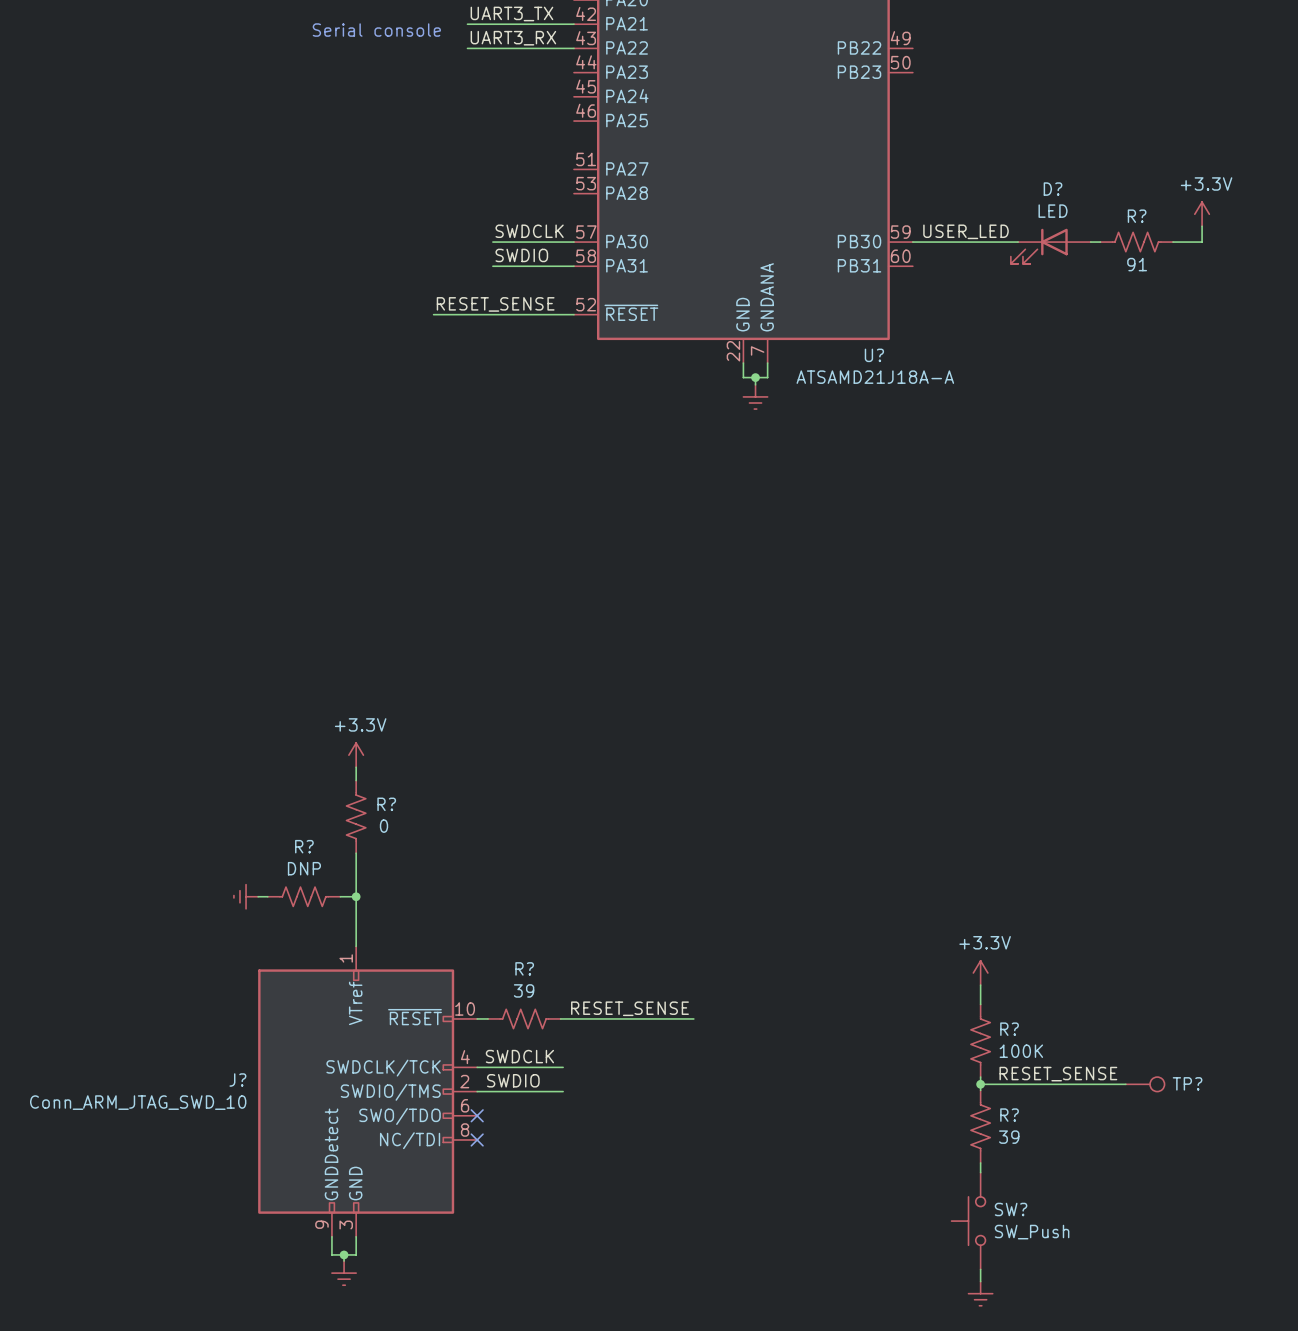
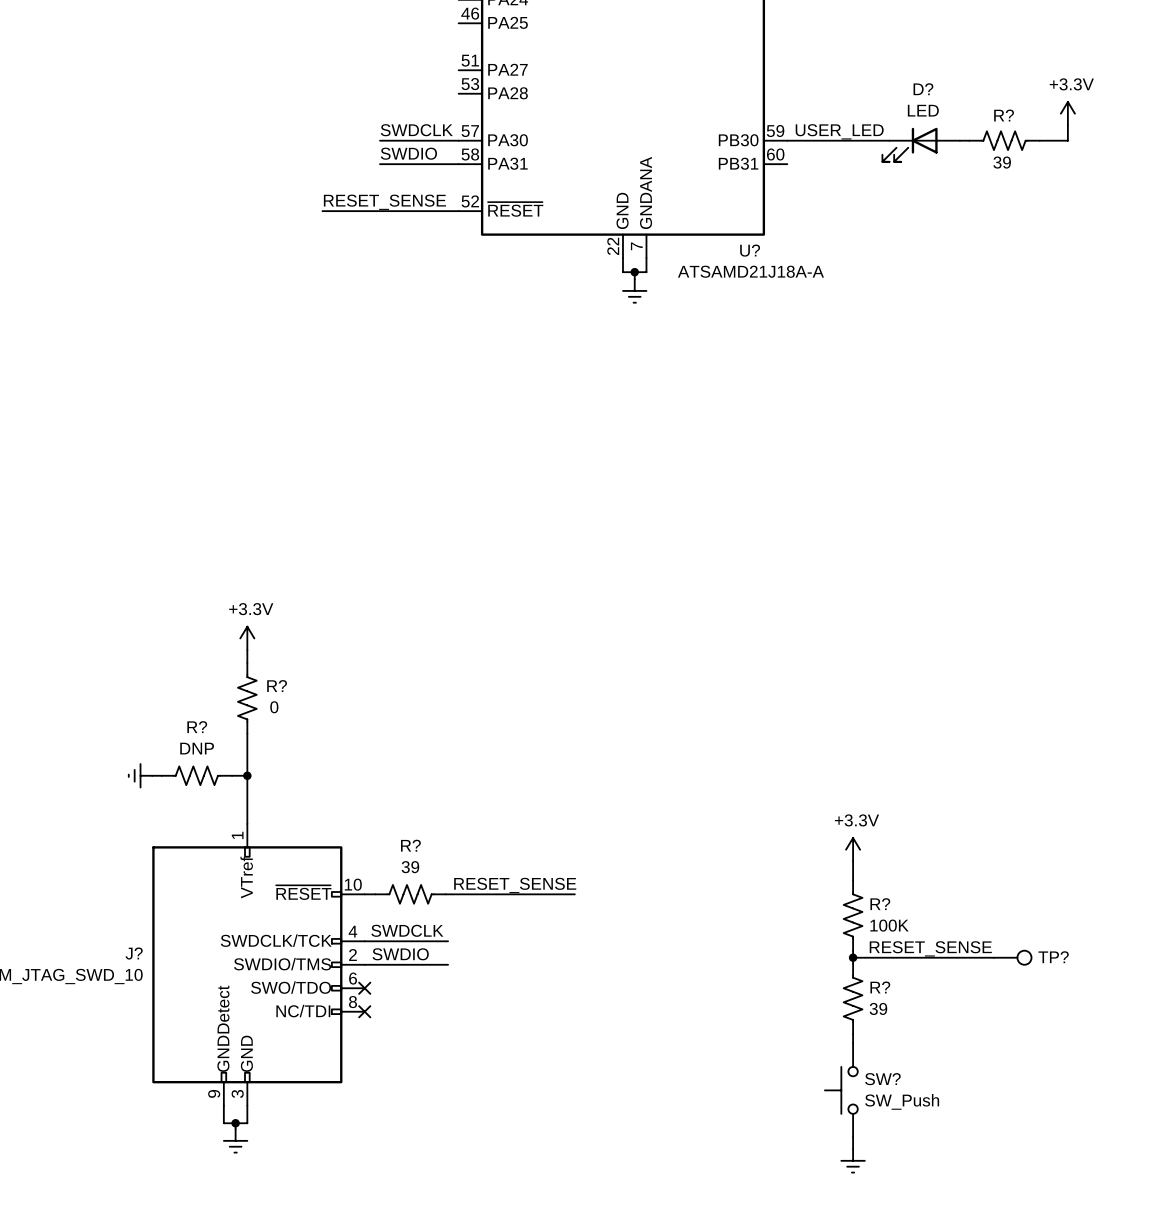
R? value: 91 (1137, 264) -> 39 (1002, 162)

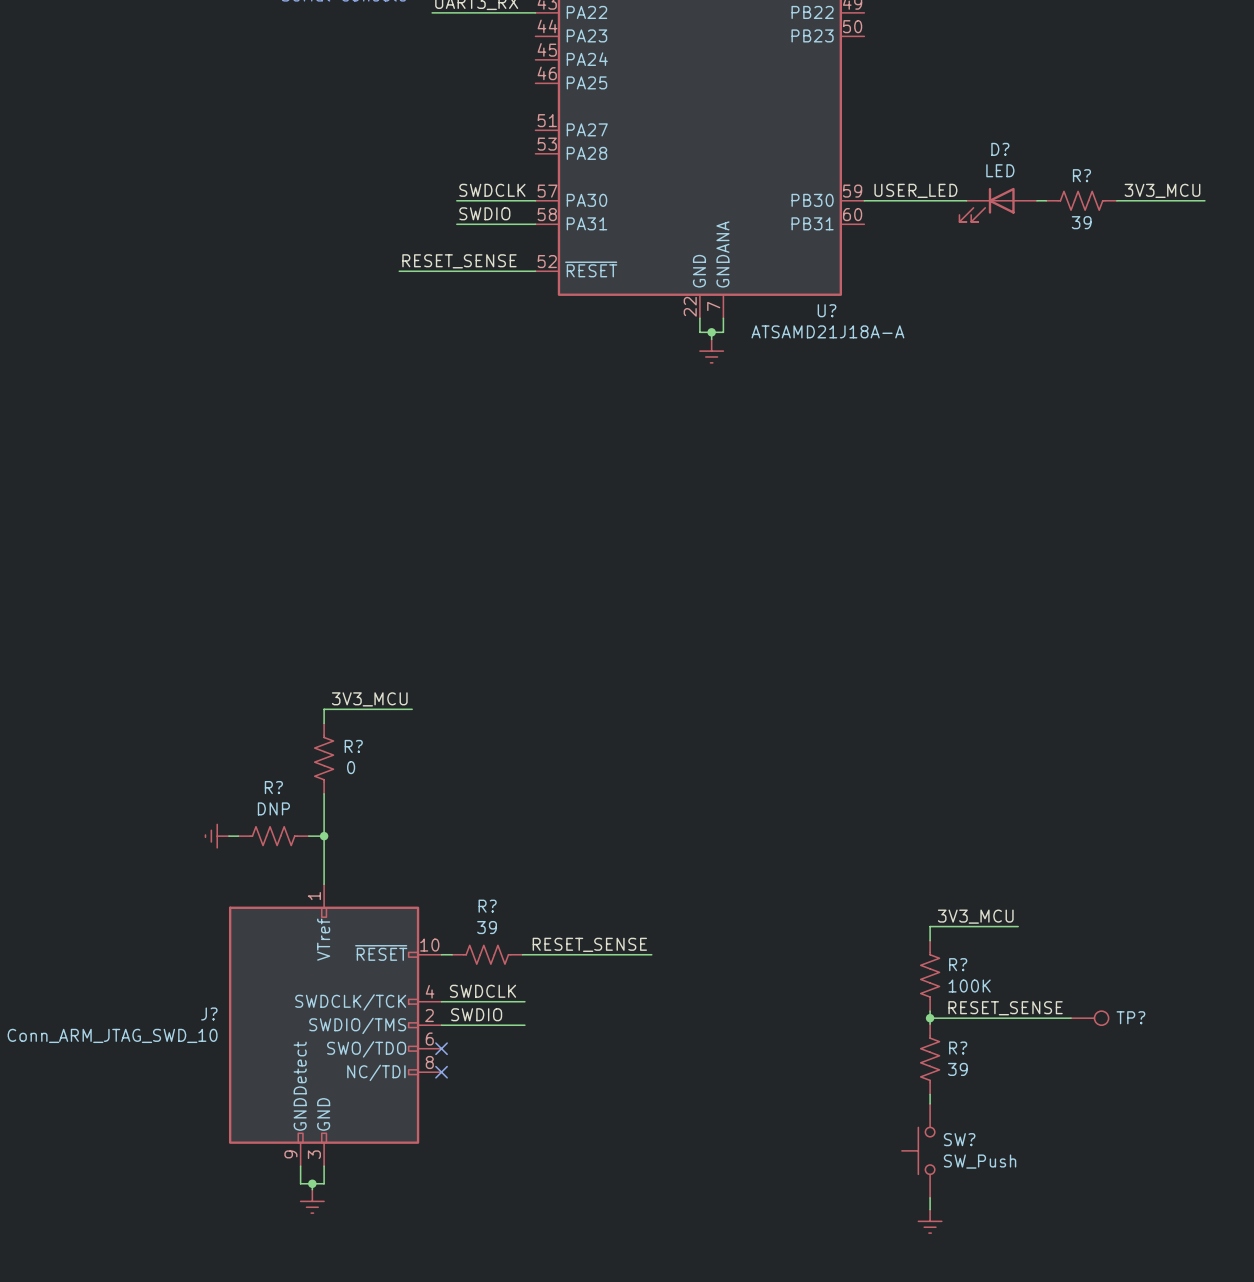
power symbol: +3.3V (1067, 113) -> none
wire: (1067, 125) (1067, 140) -> (1204, 200) (1145, 200)
label: none -> 3V3_MCU (1162, 190)
power symbol: +3.3V (247, 638) -> none
label: none -> 3V3_MCU (369, 699)
wire: none -> (412, 709) (324, 710)
power symbol: +3.3V (853, 849) -> none
label: none -> 3V3_MCU (975, 916)
wire: (853, 861) (853, 866) -> (1018, 926) (930, 926)

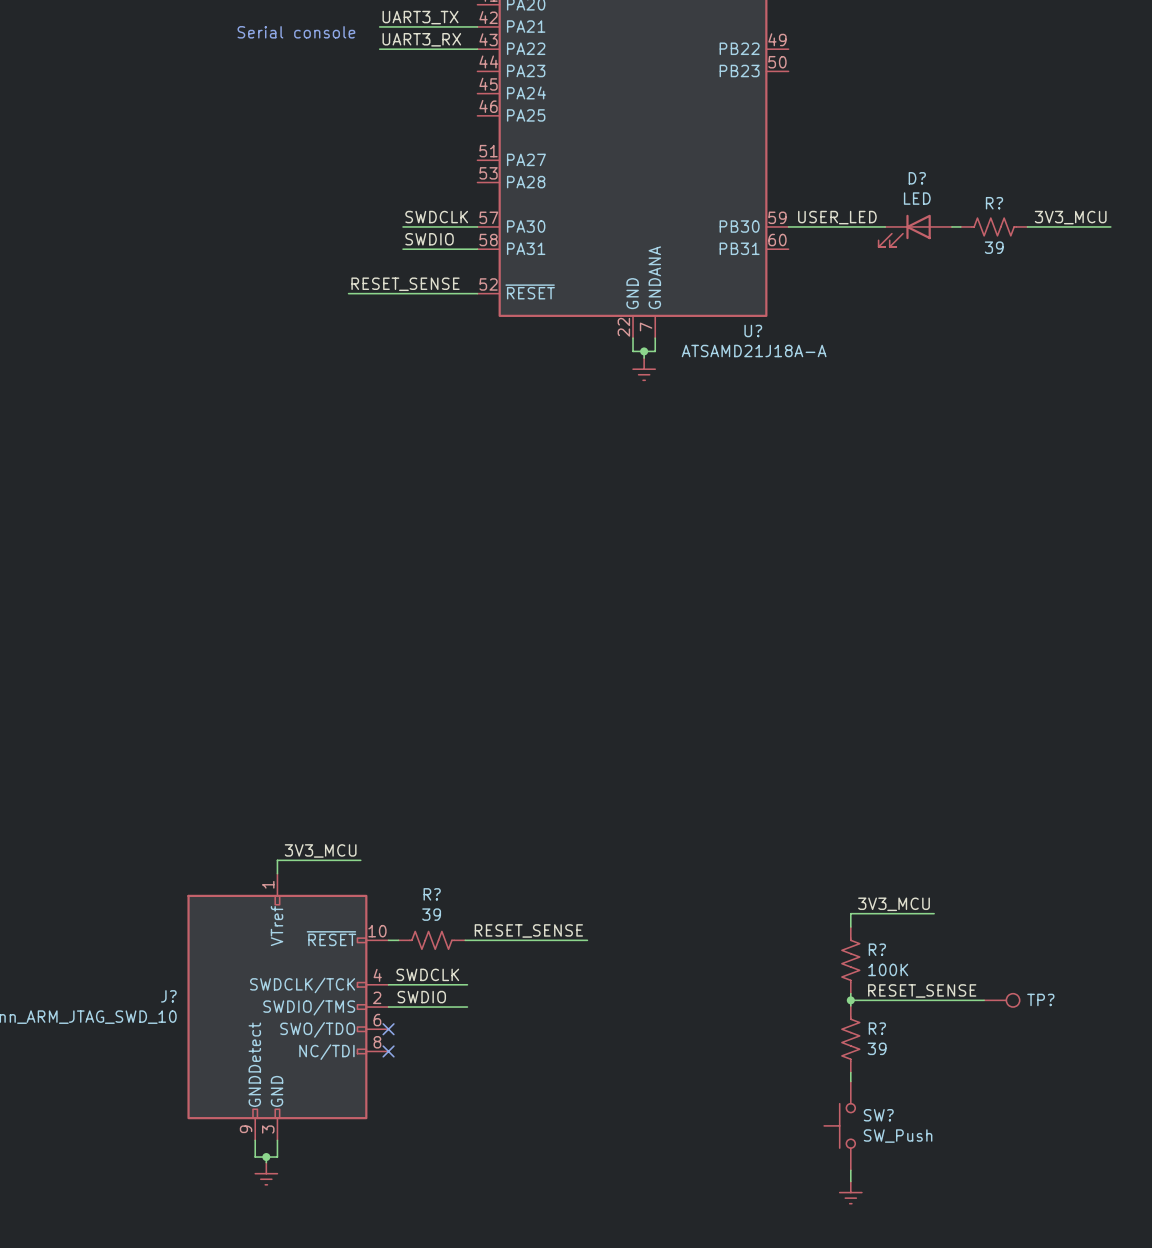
label position: 3V3_MCU (369, 699) -> 3V3_MCU (320, 850)
wire: (412, 709) (324, 709) (324, 723) -> none
R?: 0 (324, 758) -> none
wire: (324, 793) (324, 870) -> (360, 860) (277, 860)
power symbol: (217, 836) -> none
wire: (228, 836) (238, 836) -> none
R?: DNP (273, 836) -> none
wire: (308, 836) (324, 836) -> none
junction: (324, 836) -> none

